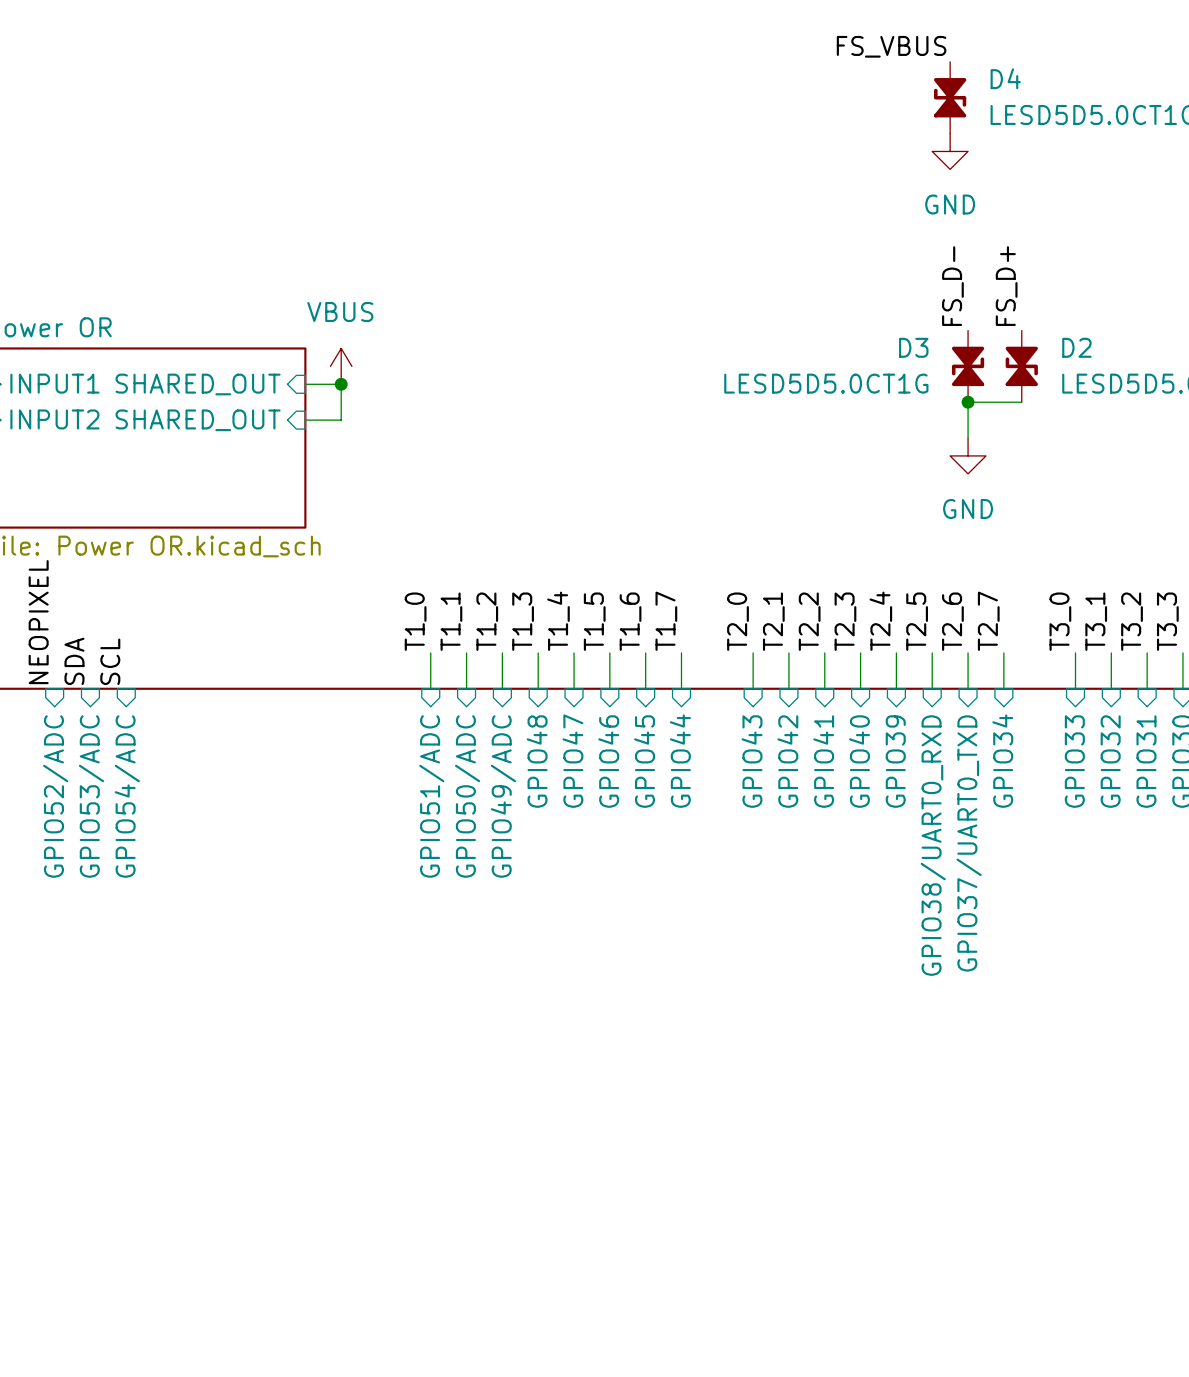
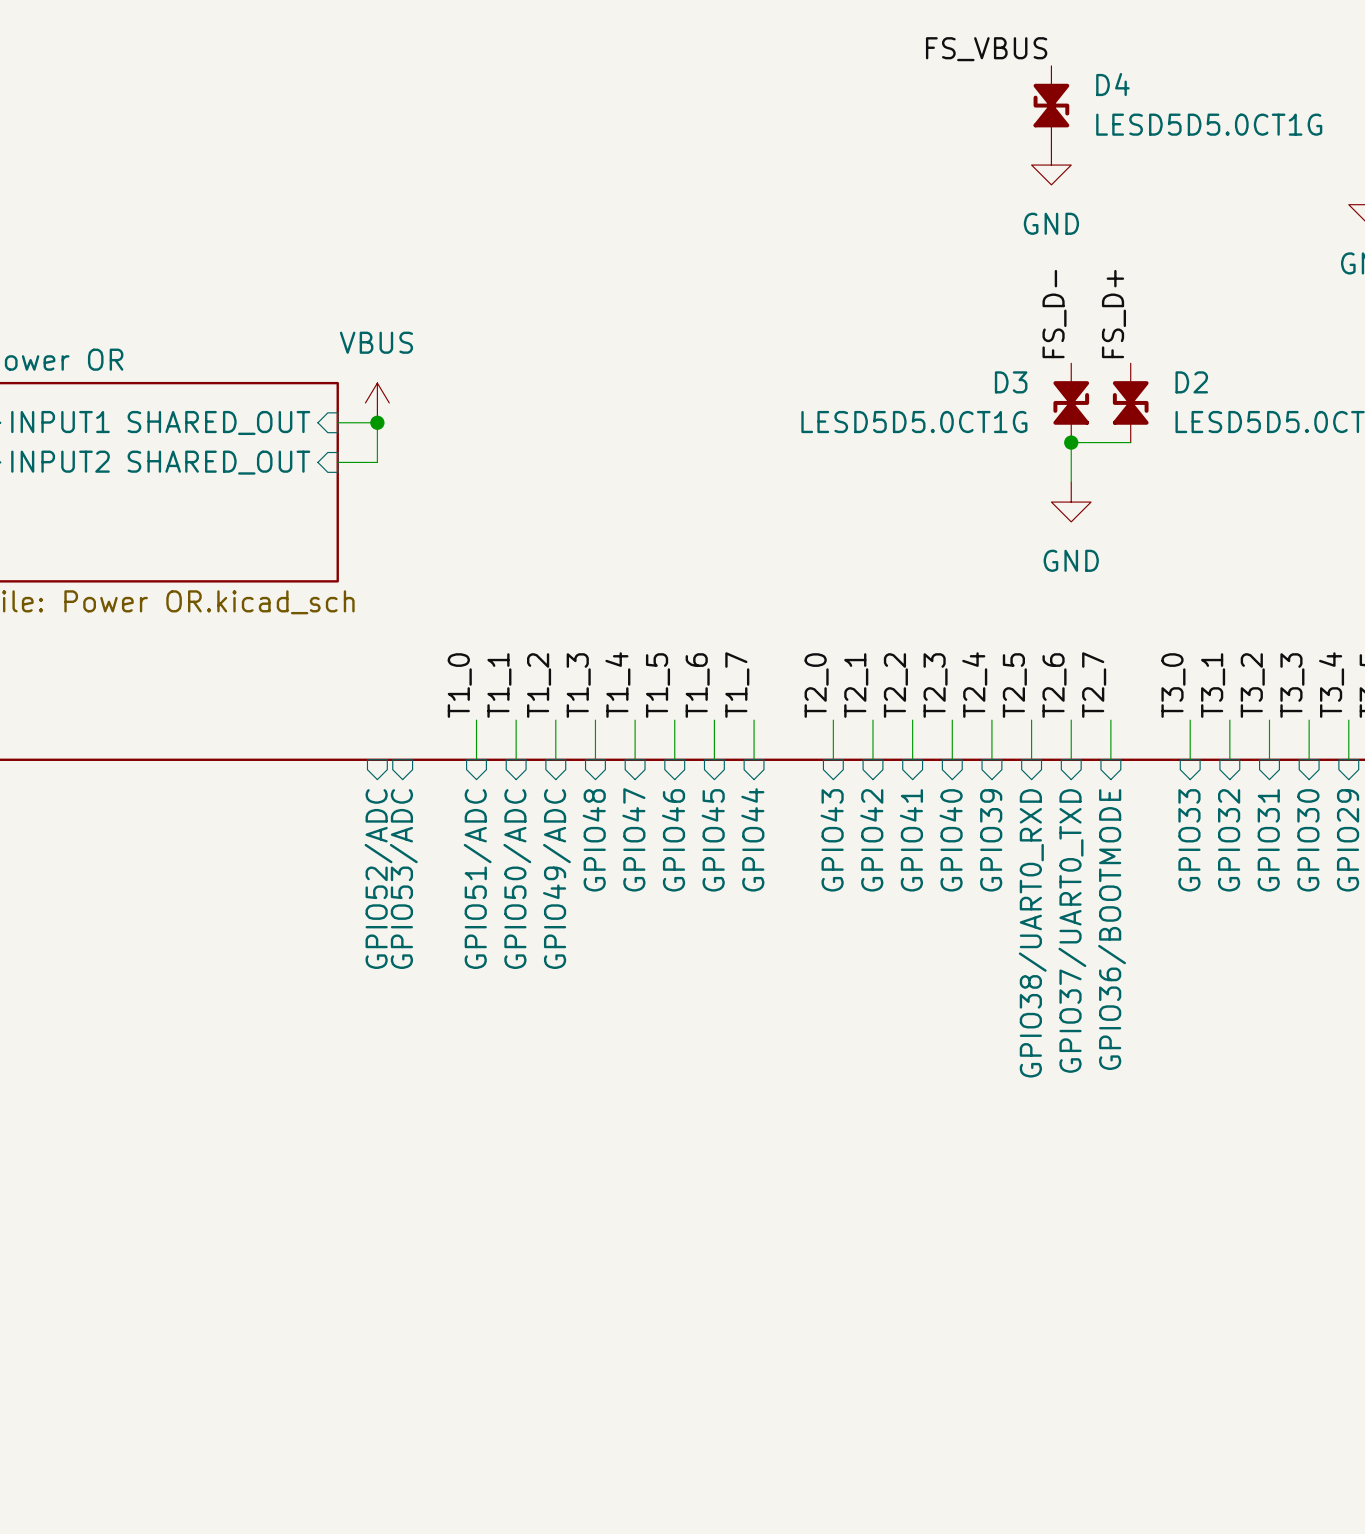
label: NEOPIXEL (38, 622) -> none
label: SDA (74, 661) -> none
label: SCL (110, 661) -> none
sheet pin: GPIO34 (1002, 761) -> GPIO36/BOOTMODE (1112, 929)
sheet pin position: GPIO52/ADC (55, 796) -> GPIO52/ADC (378, 879)
sheet pin position: GPIO53/ADC (91, 796) -> GPIO53/ADC (403, 879)
sheet pin: GPIO54/ADC (127, 796) -> none

